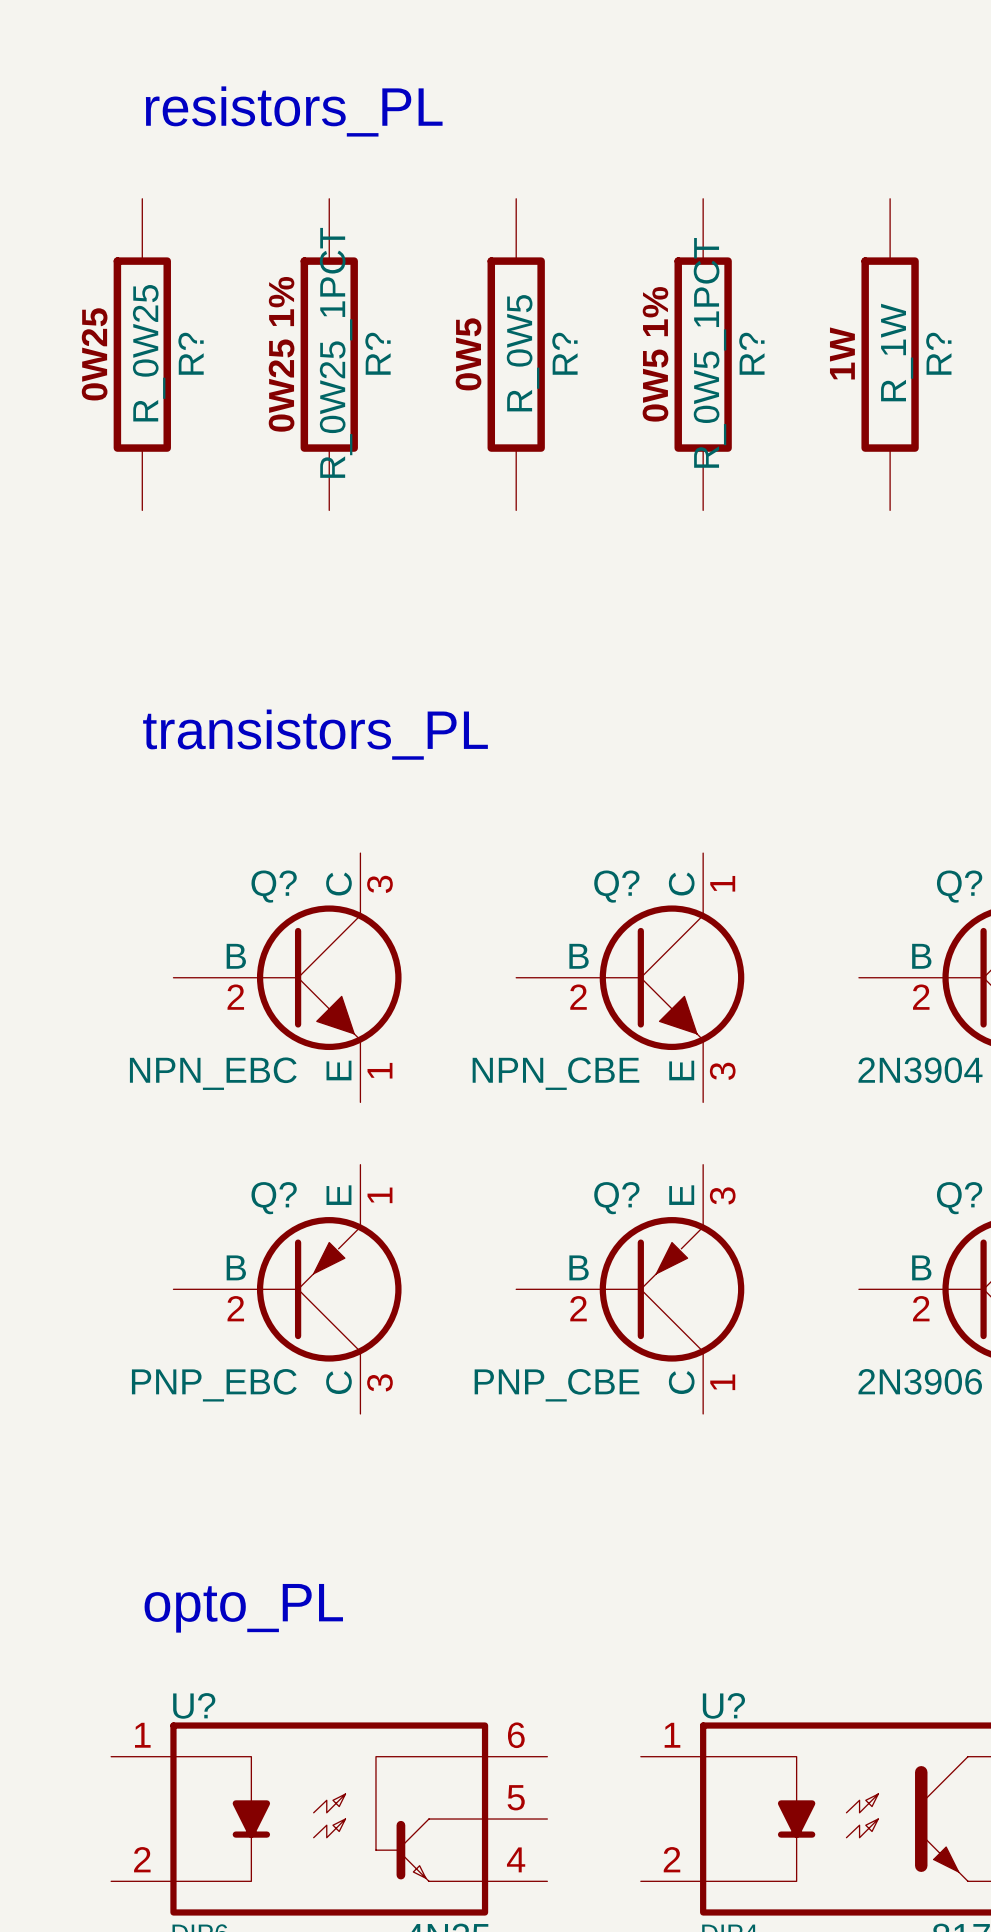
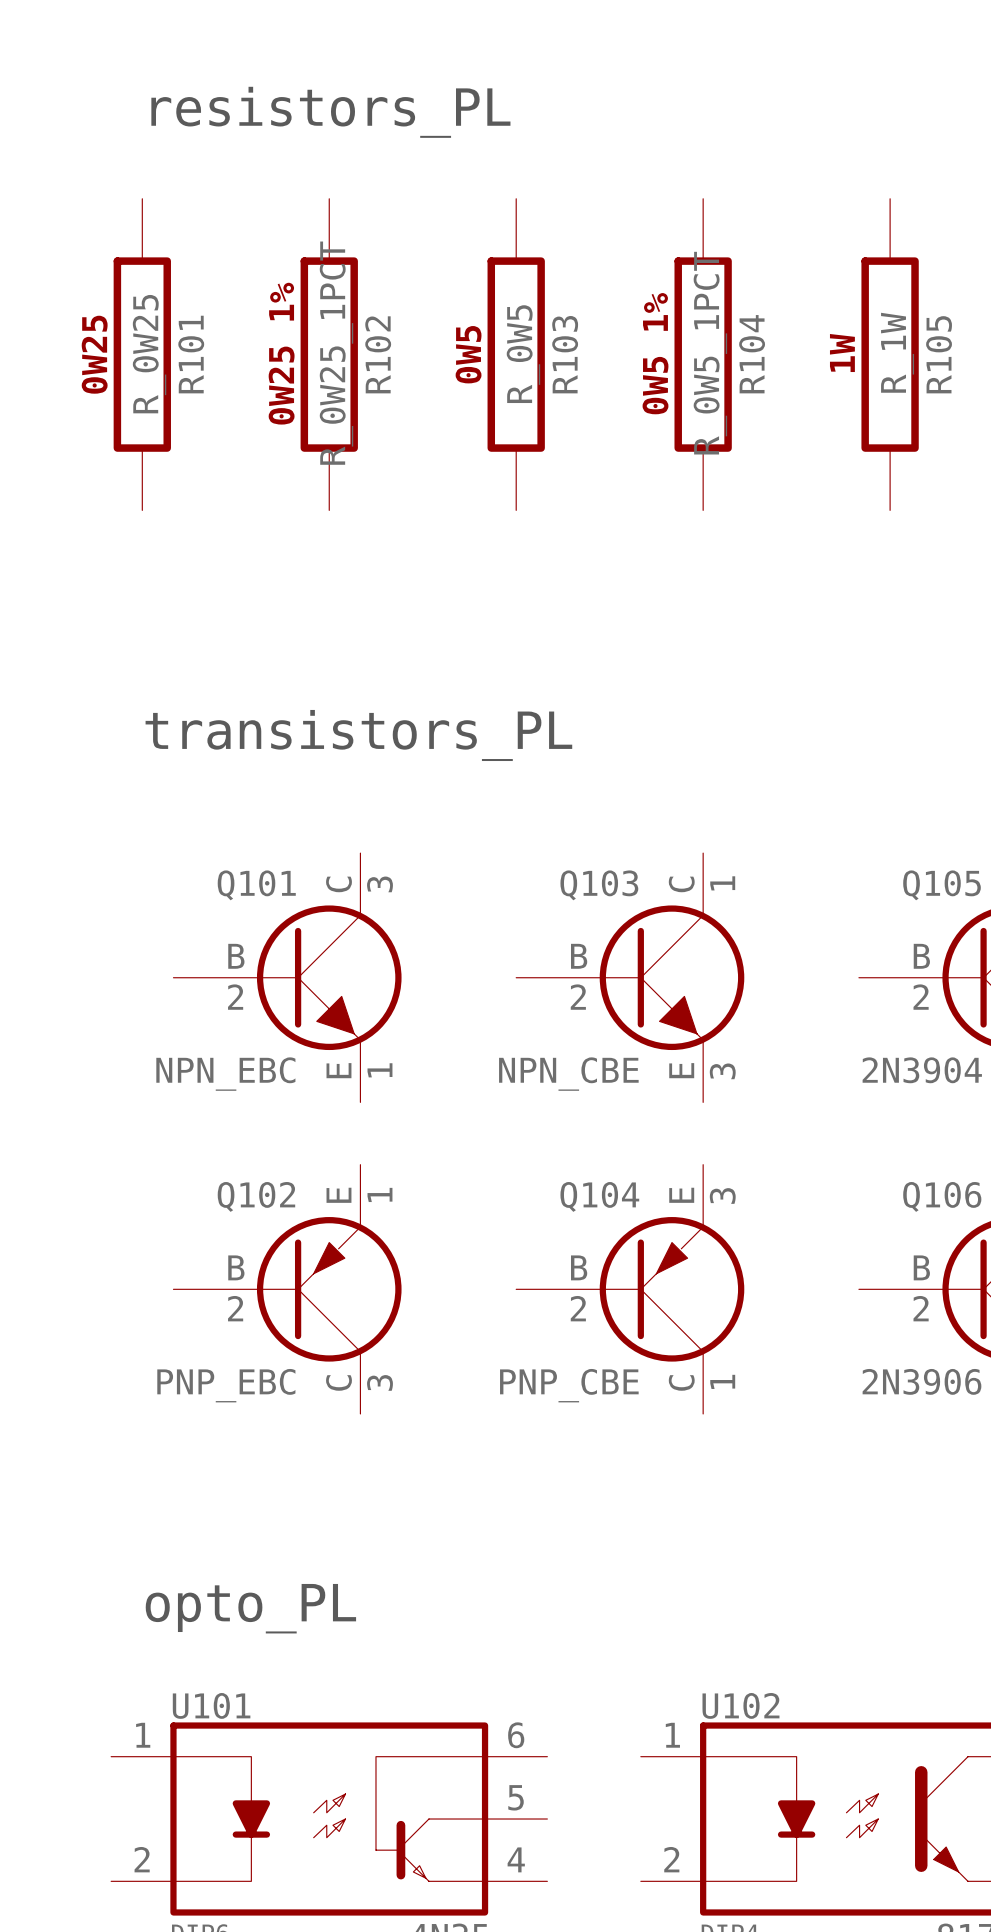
R? name: R? (191, 353) -> R101 (191, 354)
R? name: R? (377, 353) -> R102 (378, 354)
R? name: R? (564, 353) -> R103 (565, 354)
R? name: R? (751, 353) -> R104 (752, 354)
R? name: R? (938, 353) -> R105 (939, 354)
Q? name: Q? (274, 886) -> Q101 (256, 885)
Q? name: Q? (616, 886) -> Q103 (599, 885)
Q? name: Q? (959, 886) -> Q105 (942, 885)
Q? name: Q? (274, 1198) -> Q102 (256, 1196)
Q? name: Q? (616, 1198) -> Q104 (599, 1196)
Q? name: Q? (959, 1198) -> Q106 (942, 1196)
U? name: U? (194, 1705) -> U101 (211, 1705)
U? name: U? (723, 1705) -> U102 (740, 1705)

